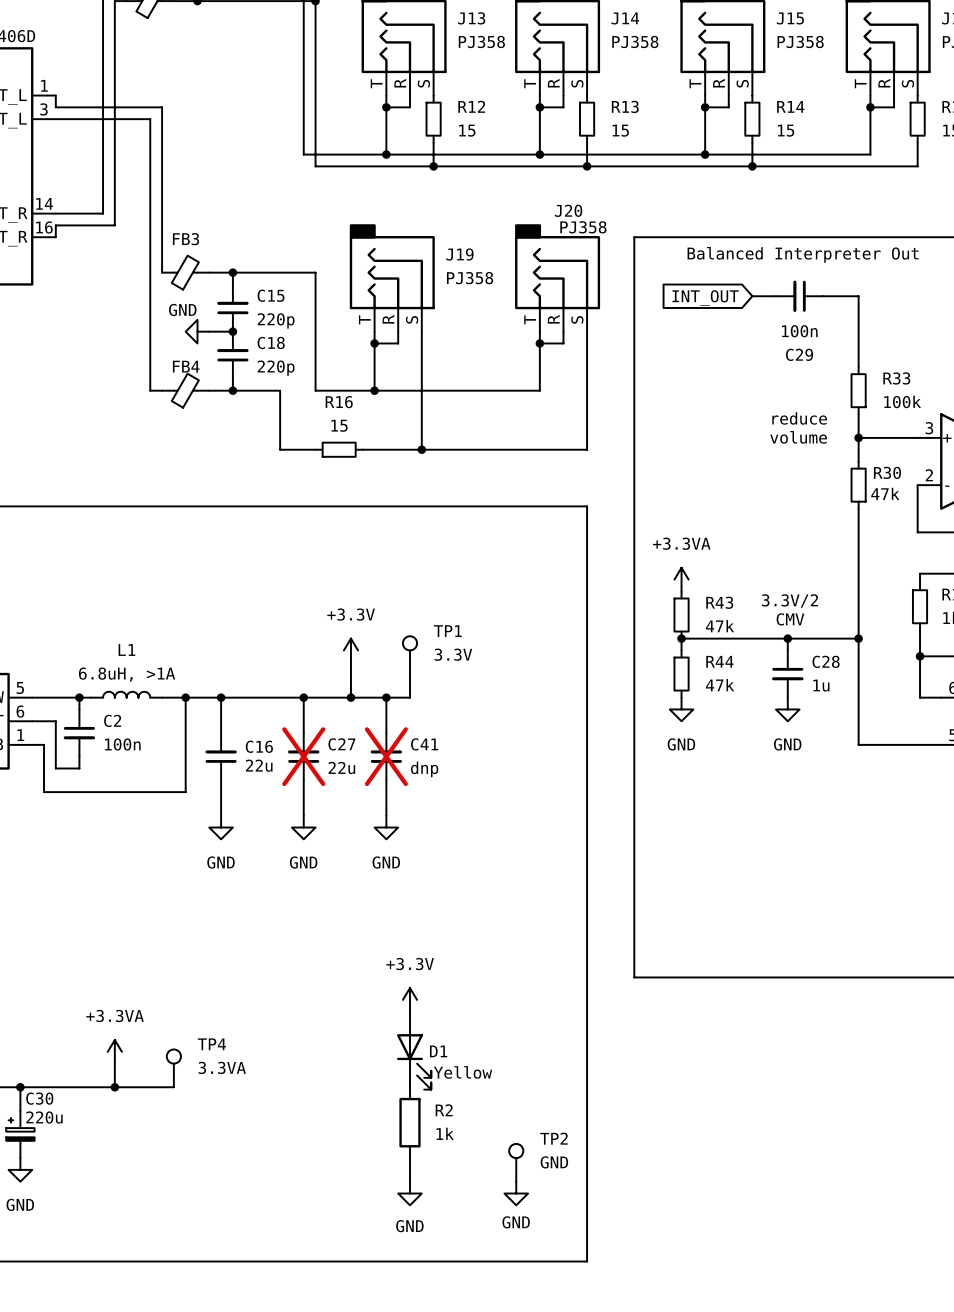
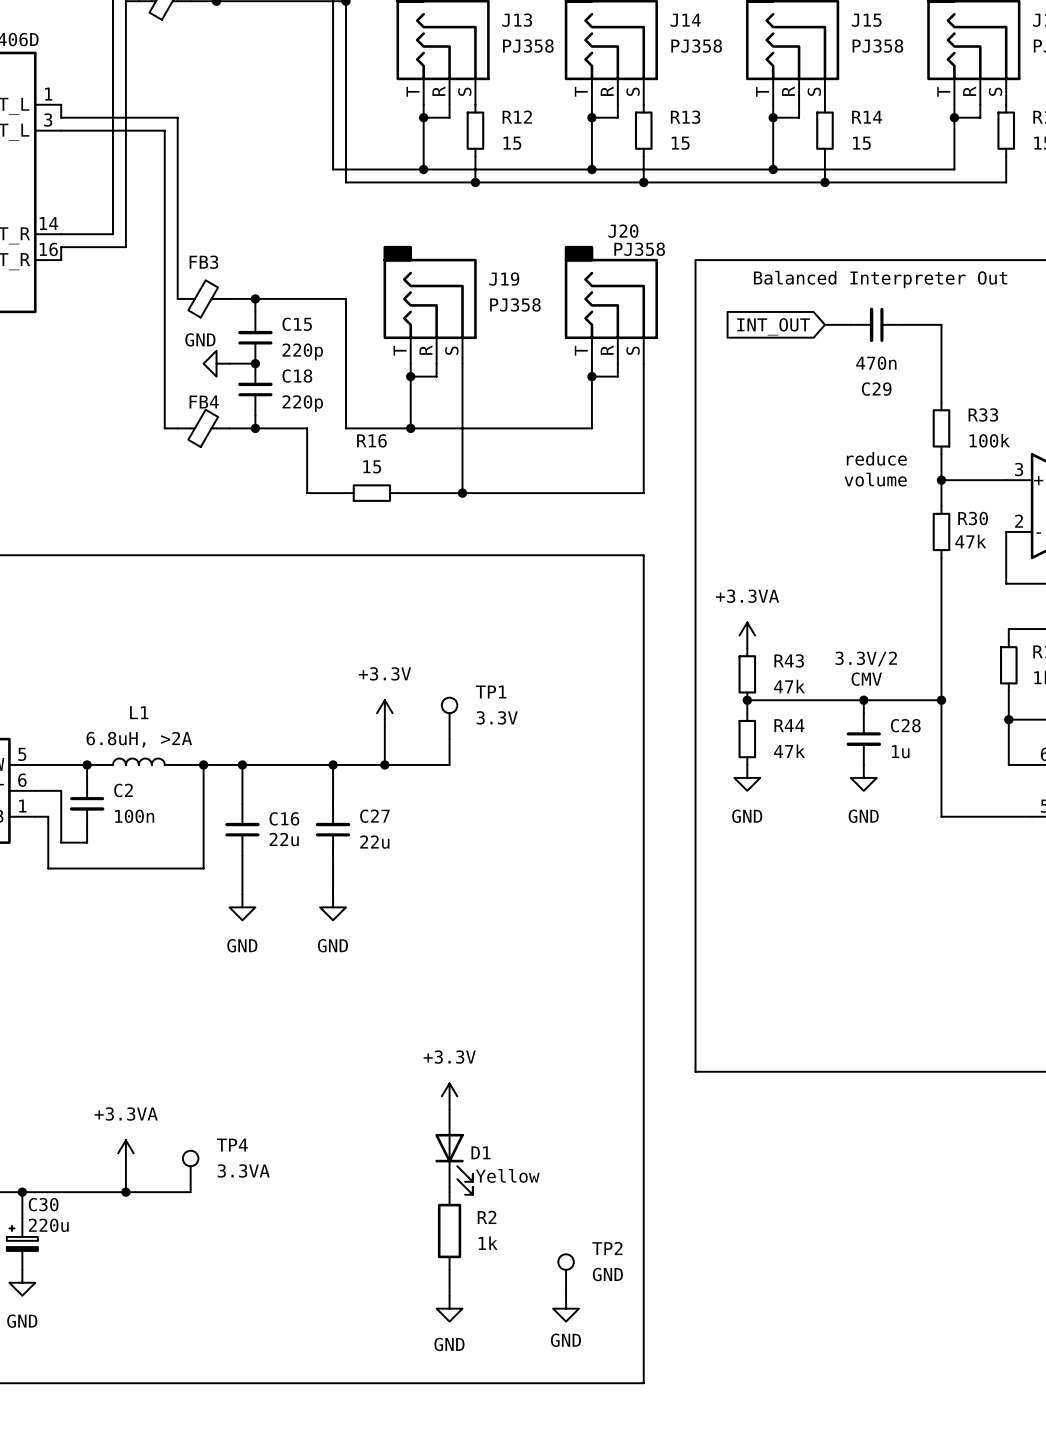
C29 value: 100n (799, 331) -> 470n (876, 363)
L1 value: 6.8uH, >1A (127, 674) -> 6.8uH, >2A (139, 739)
wire: (386, 697) (386, 733) -> none
junction: (386, 697) -> none
C27 do-not-place cross: (303, 756) -> none
C41: dnp (386, 756) -> none
wire: (386, 780) (386, 815) -> none
power symbol: GND (386, 827) -> none

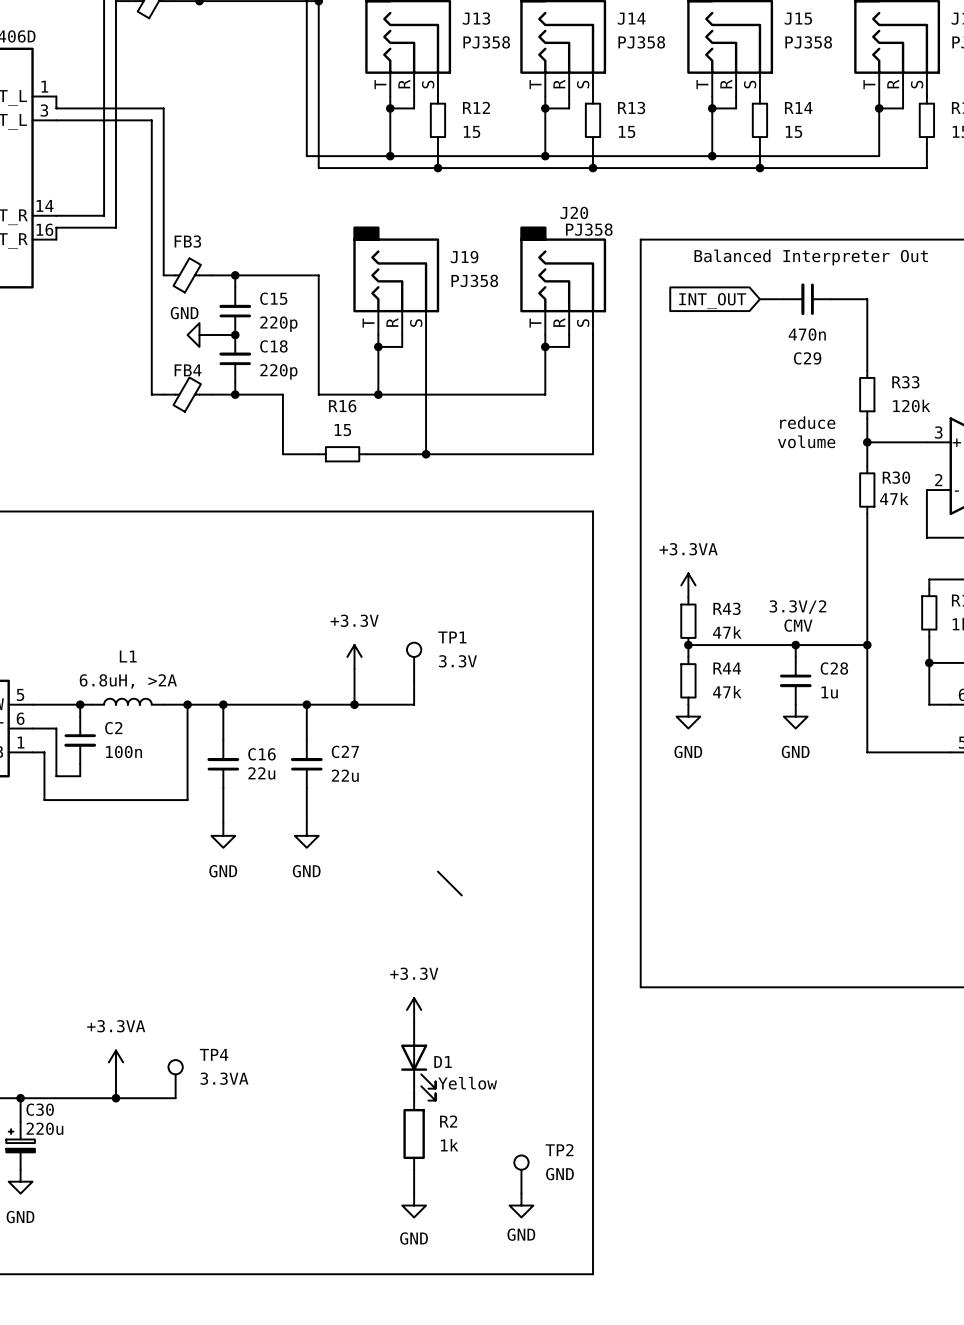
R33 value: 100k (989, 440) -> 120k (911, 405)
wire: none -> (437, 871) (461, 895)

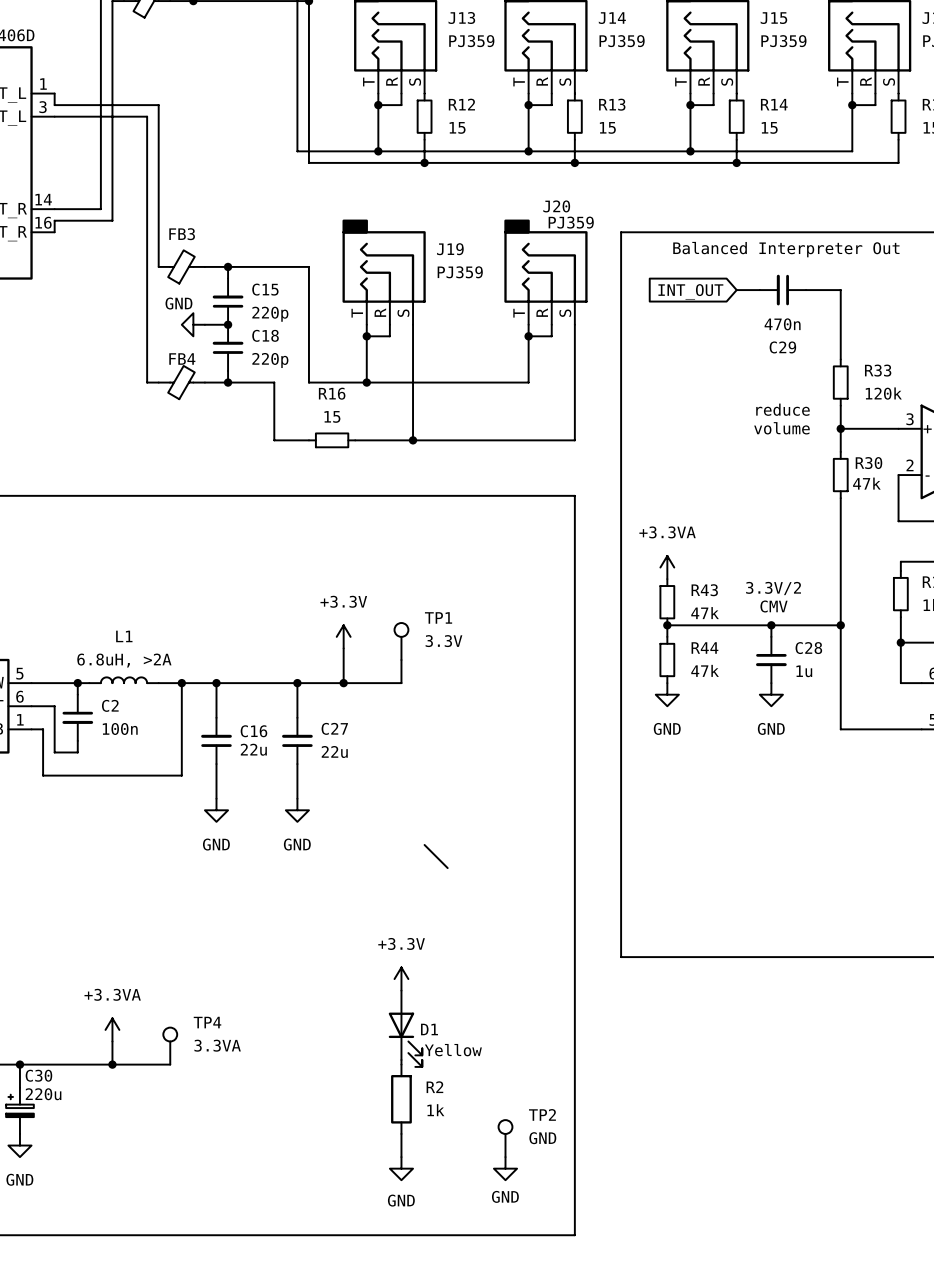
J13 value: PJ358 (486, 42) -> PJ359 (471, 41)
J14 value: PJ358 (641, 42) -> PJ359 (622, 41)
J15 value: PJ358 (808, 42) -> PJ359 (783, 41)
J20 value: PJ358 (589, 229) -> PJ359 (571, 222)
J19 value: PJ358 (474, 280) -> PJ359 (460, 272)

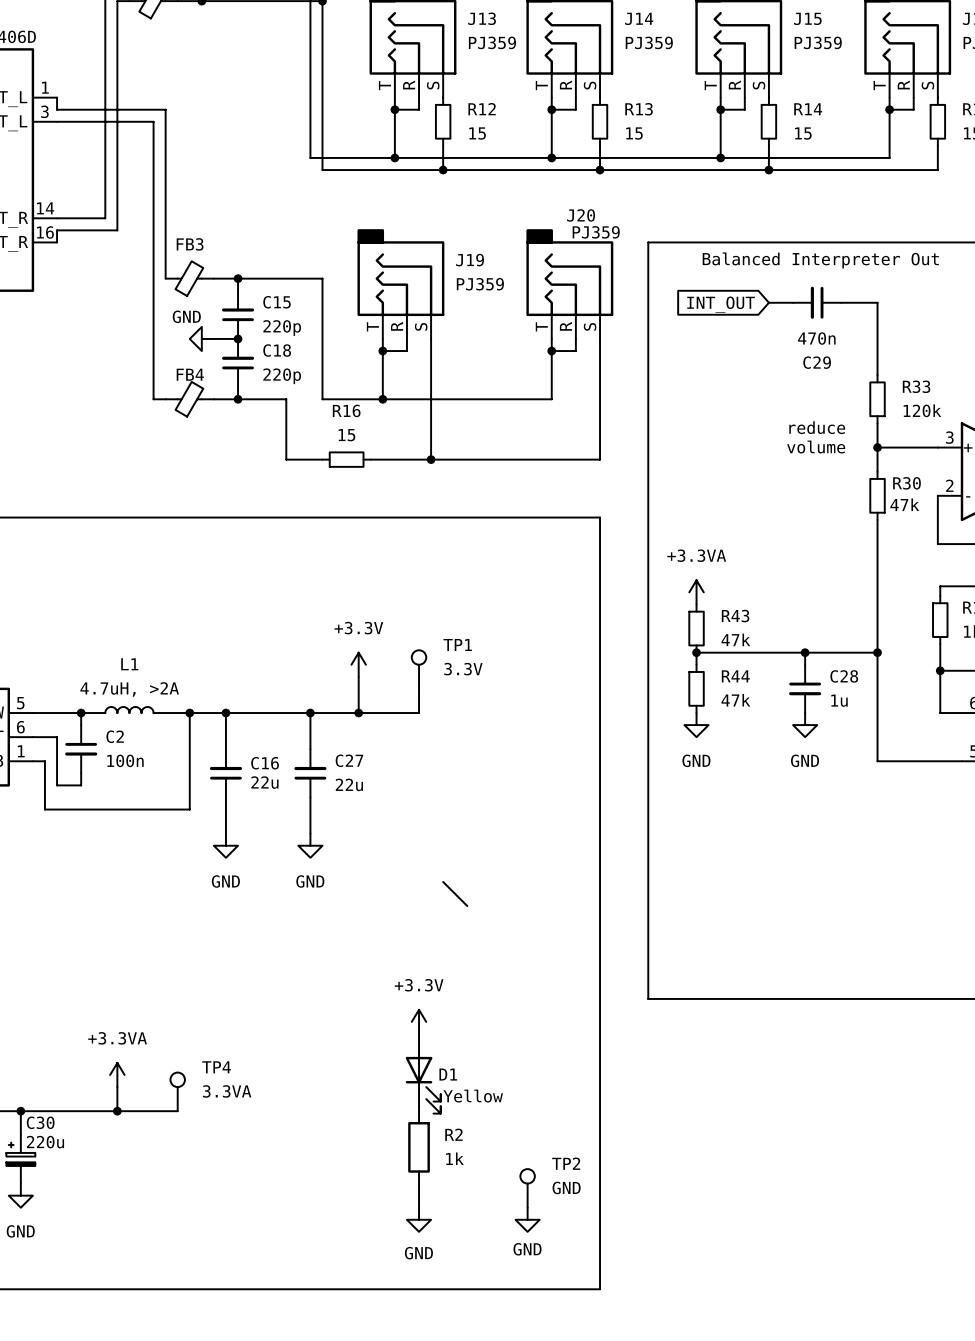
text: 3.3V/2 (773, 588) -> none
text: CMV (774, 606) -> none
L1 value: 6.8uH, >2A (124, 660) -> 4.7uH, >2A (129, 689)

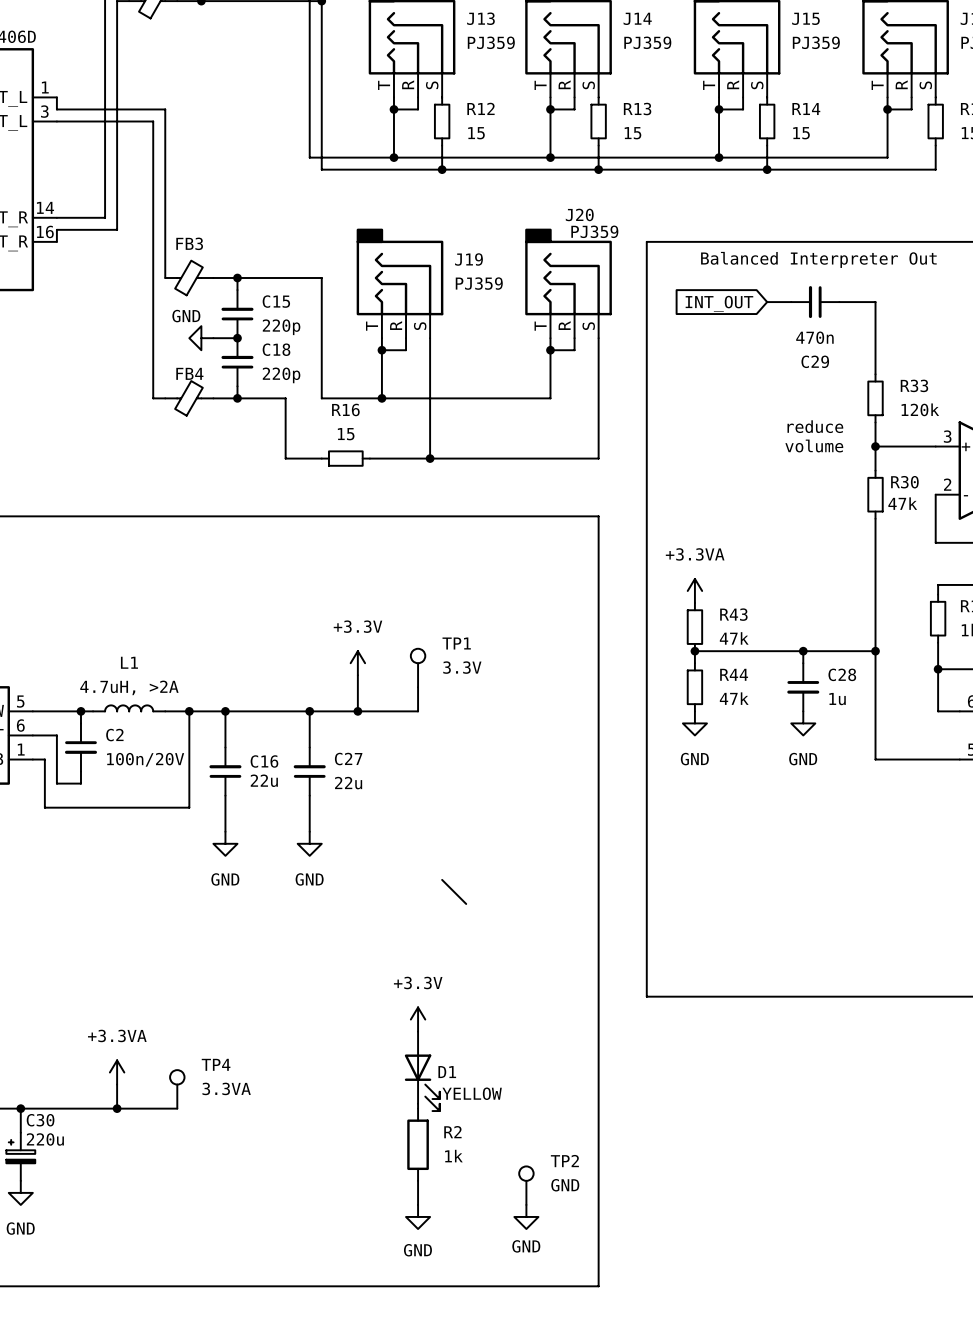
C2 value: 100n (125, 760) -> 100n/20V (145, 759)
D1 value: Yellow (473, 1096) -> YELLOW (472, 1093)

